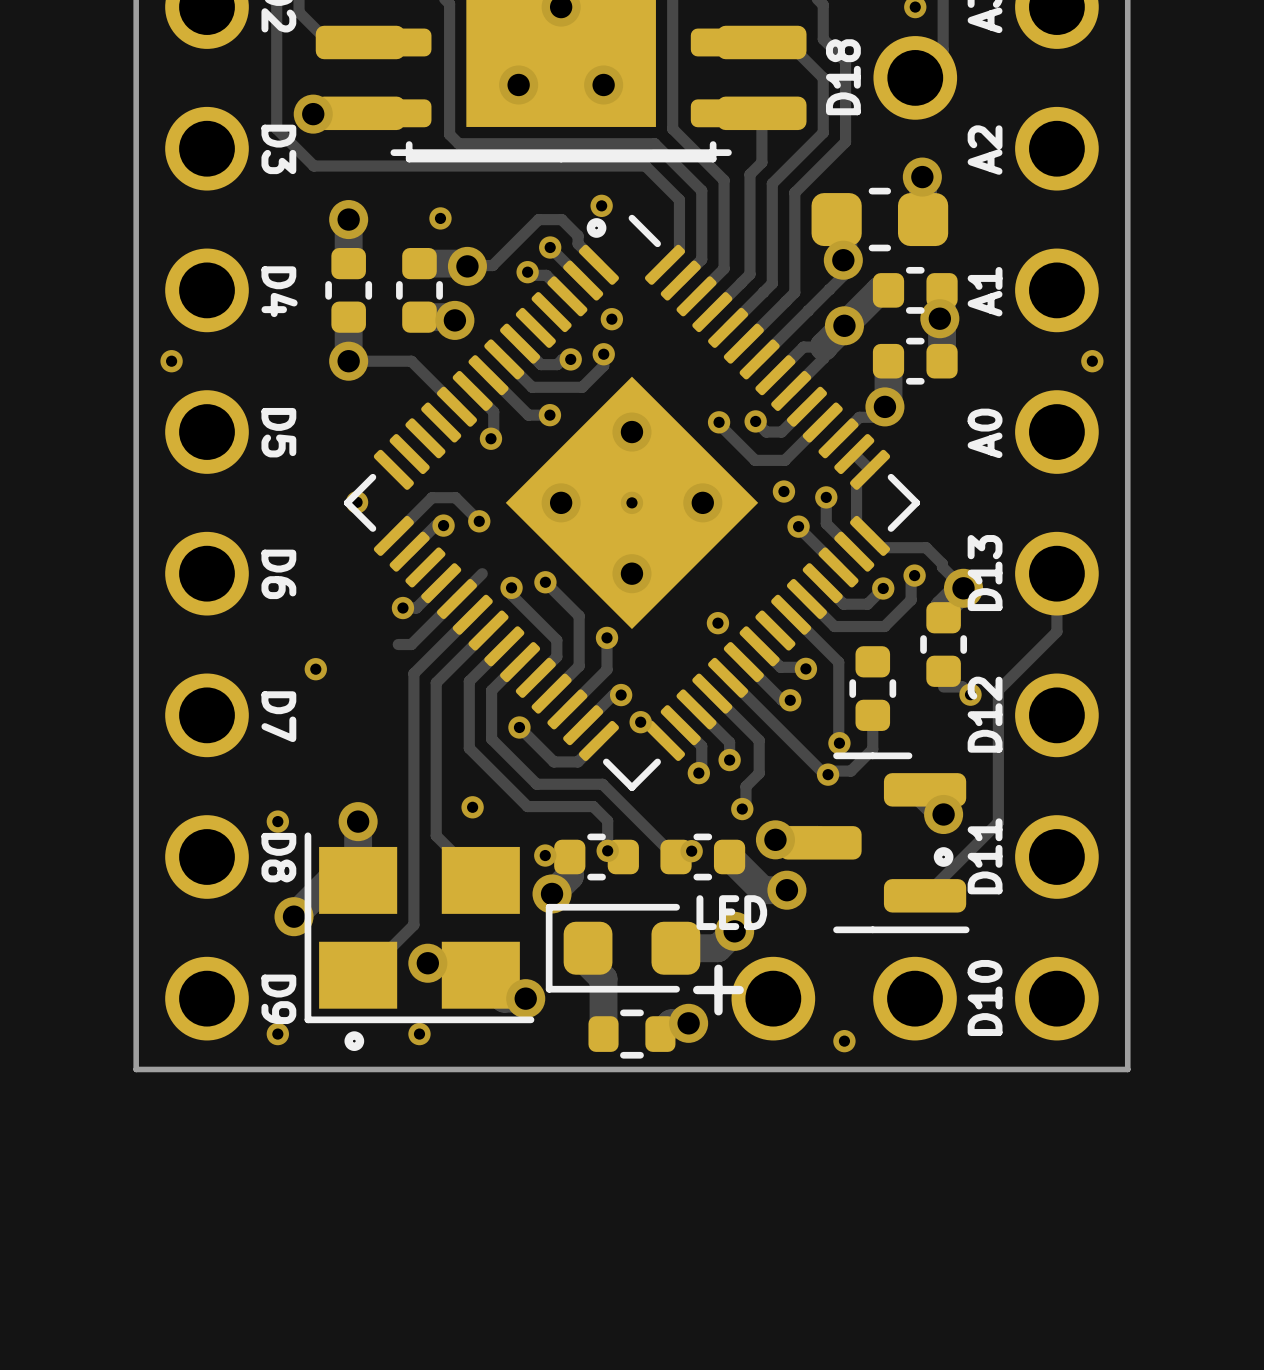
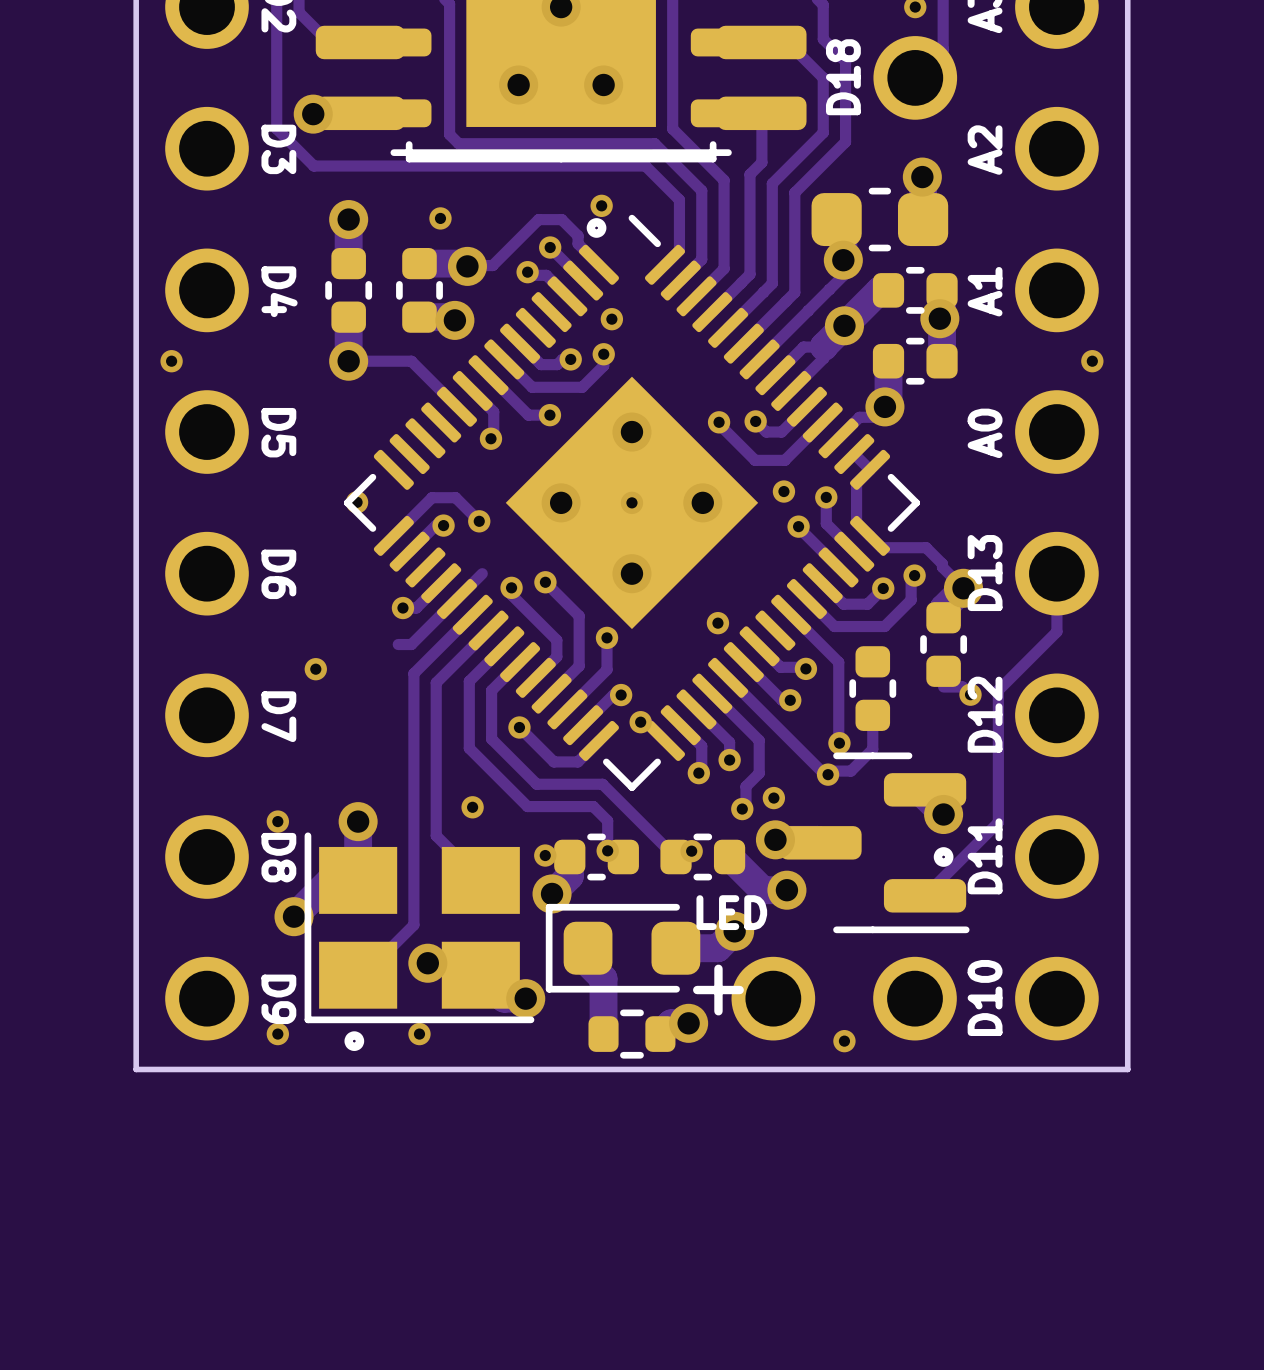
via: none -> (773, 798)

